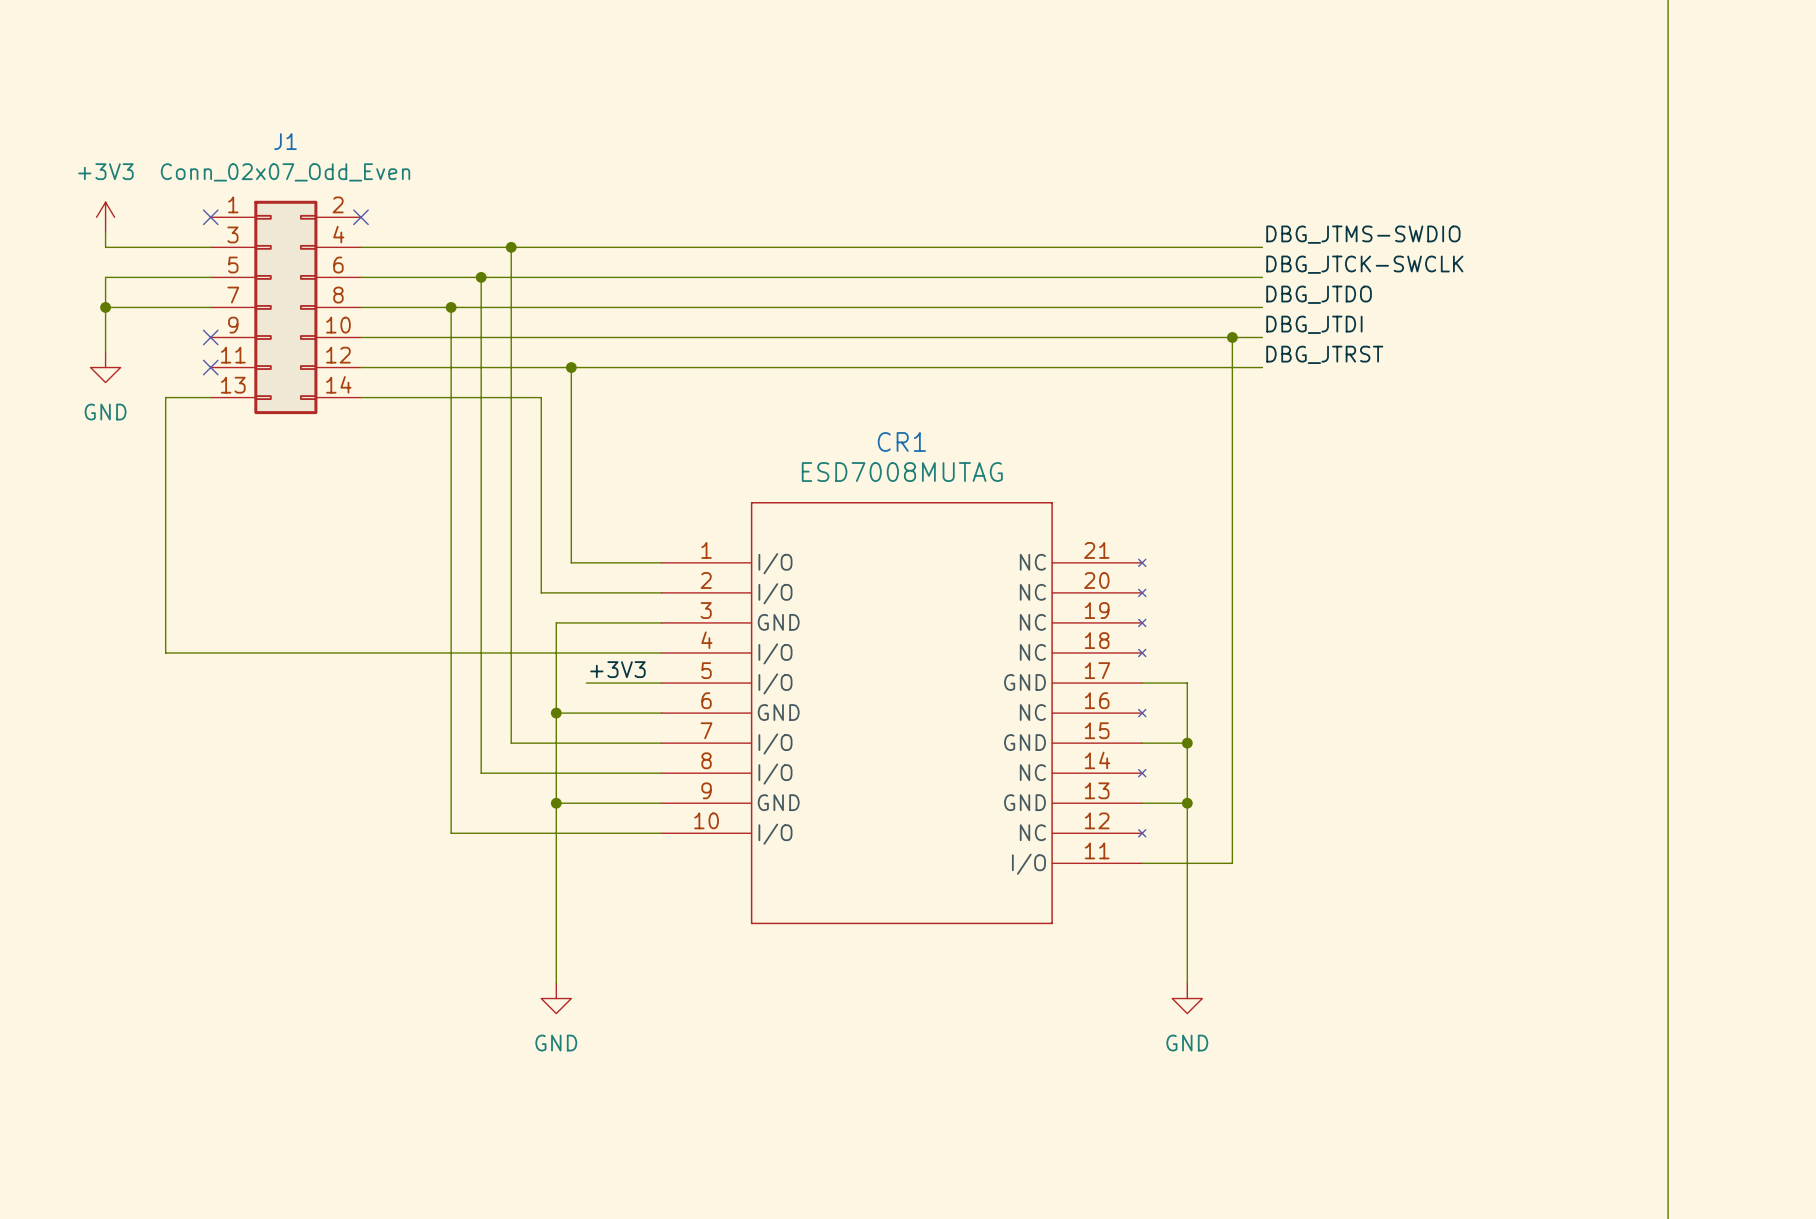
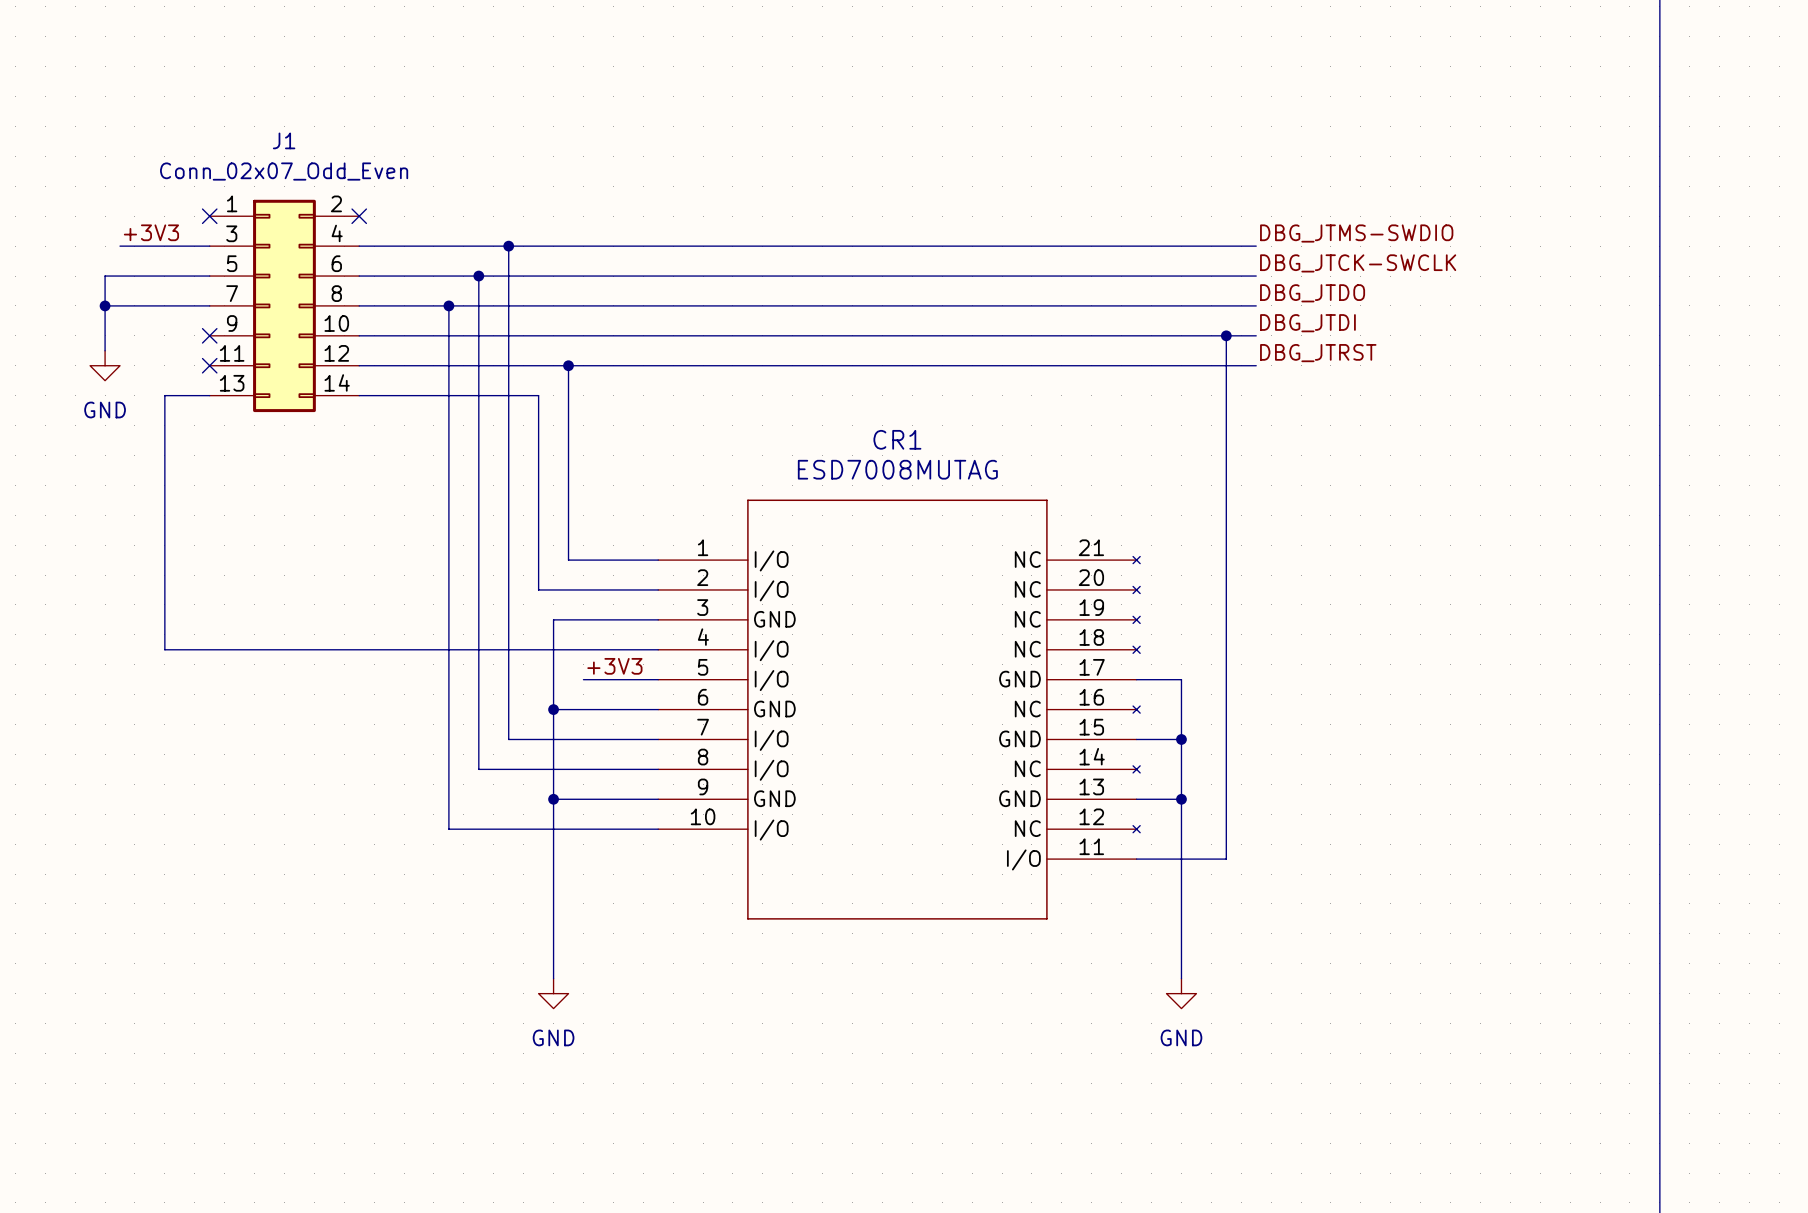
power symbol: +3V3 (105, 217) -> none
wire: (105, 232) (105, 247) (120, 247) -> none
label: none -> +3V3 (151, 232)

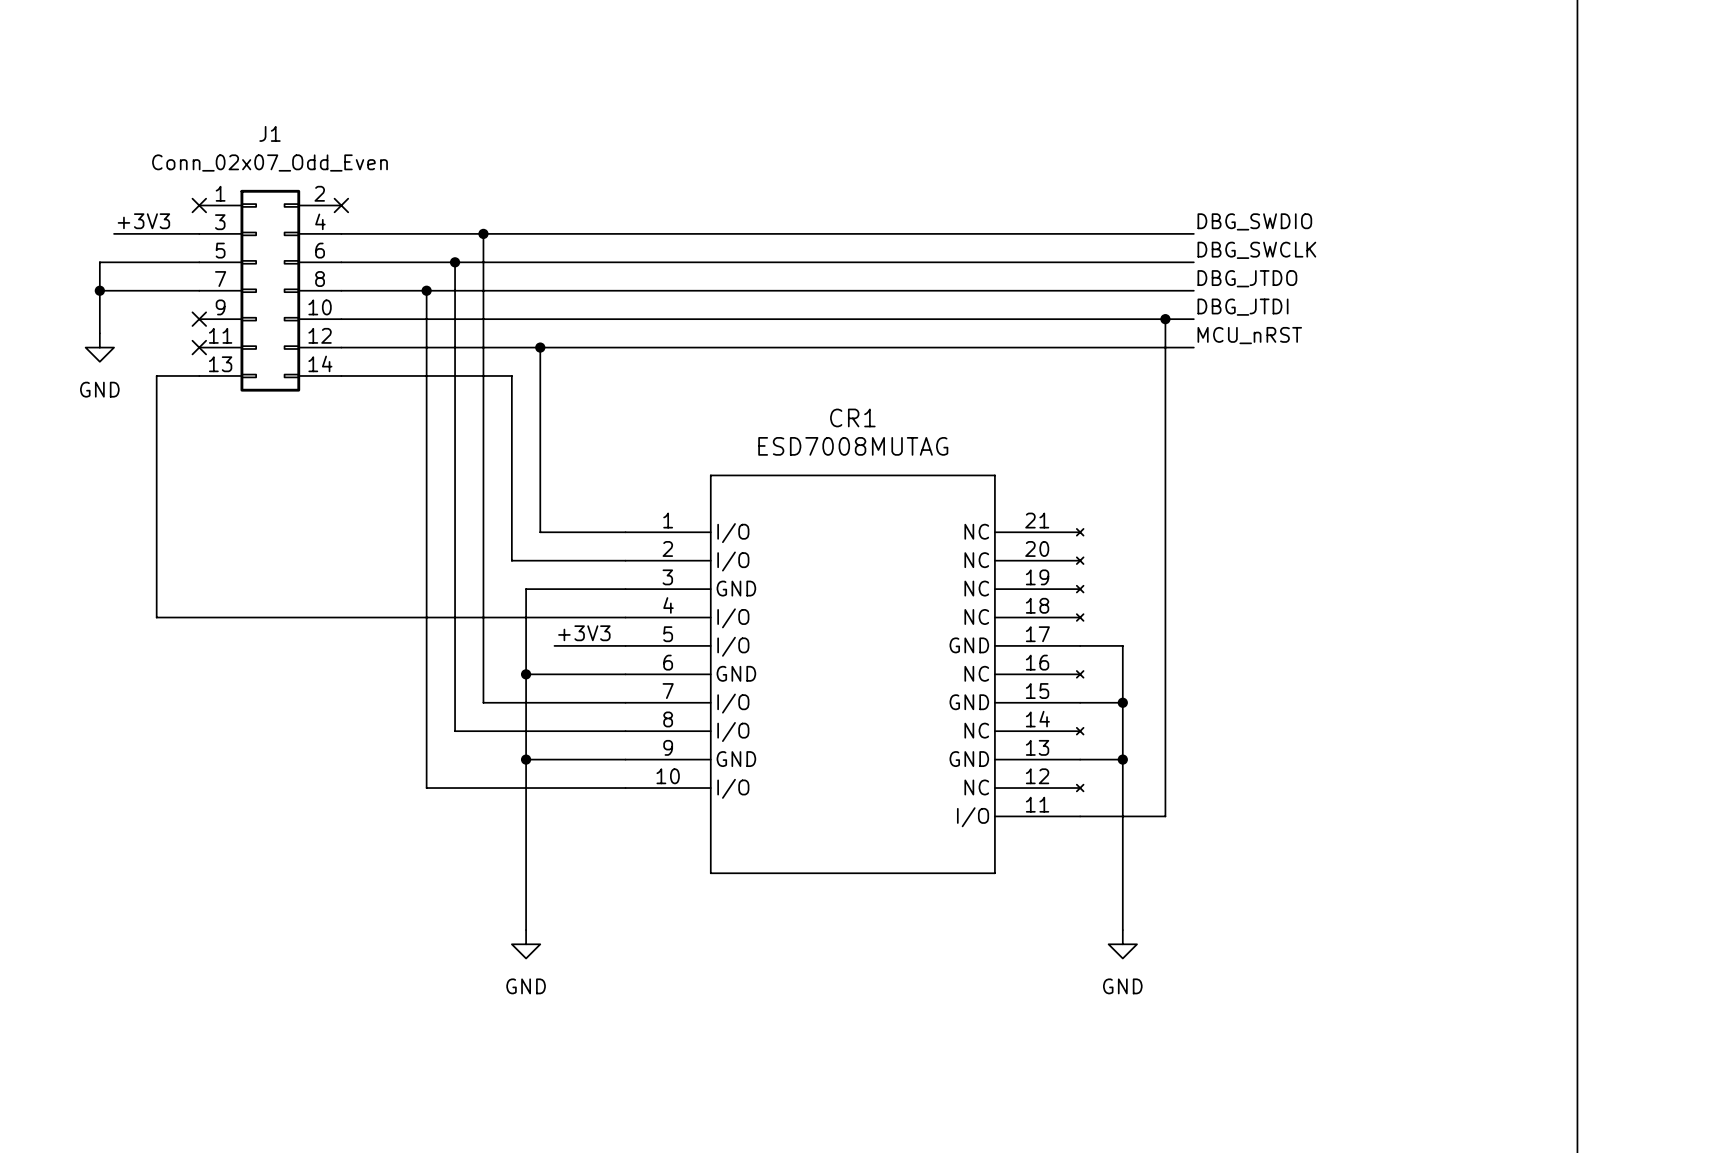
label: DBG_JTMS-SWDIO (1356, 233) -> DBG_SWDIO (1254, 221)
label: DBG_JTCK-SWCLK (1358, 263) -> DBG_SWCLK (1256, 250)
label: DBG_JTRST (1318, 353) -> MCU_nRST (1249, 335)

